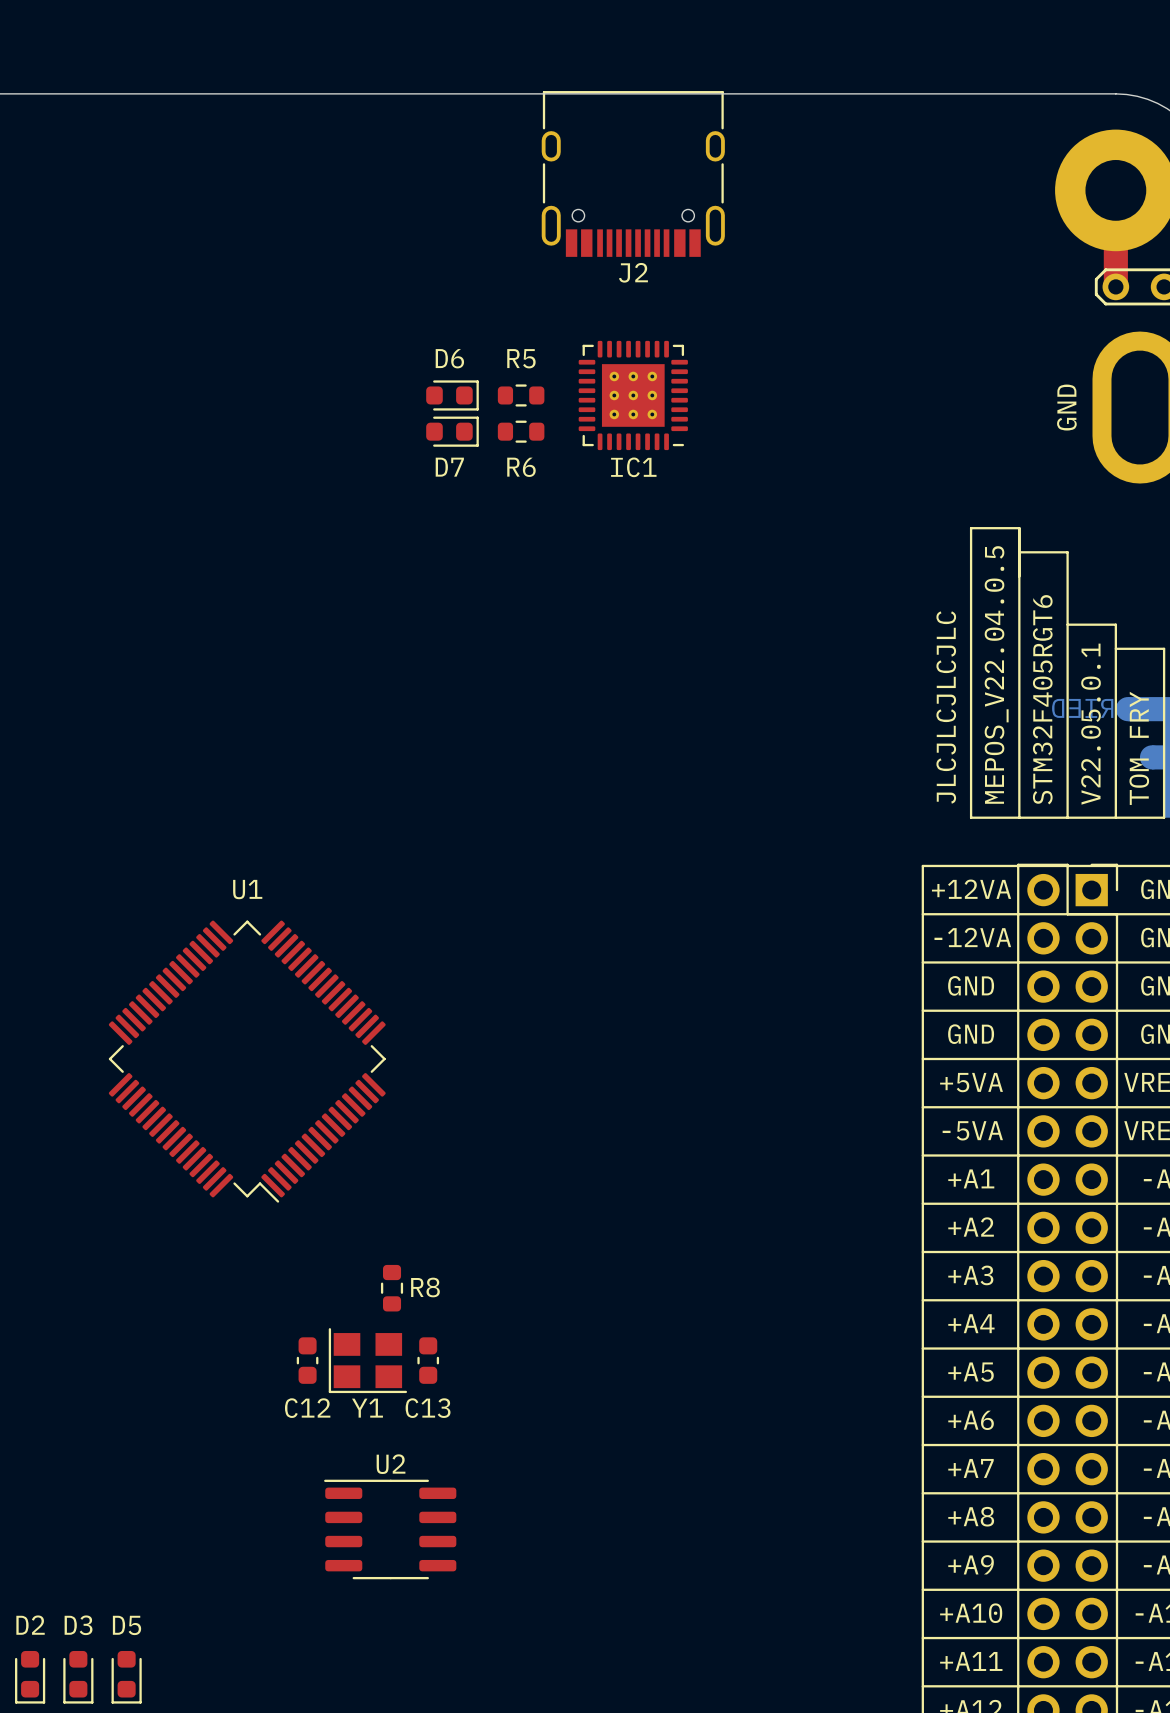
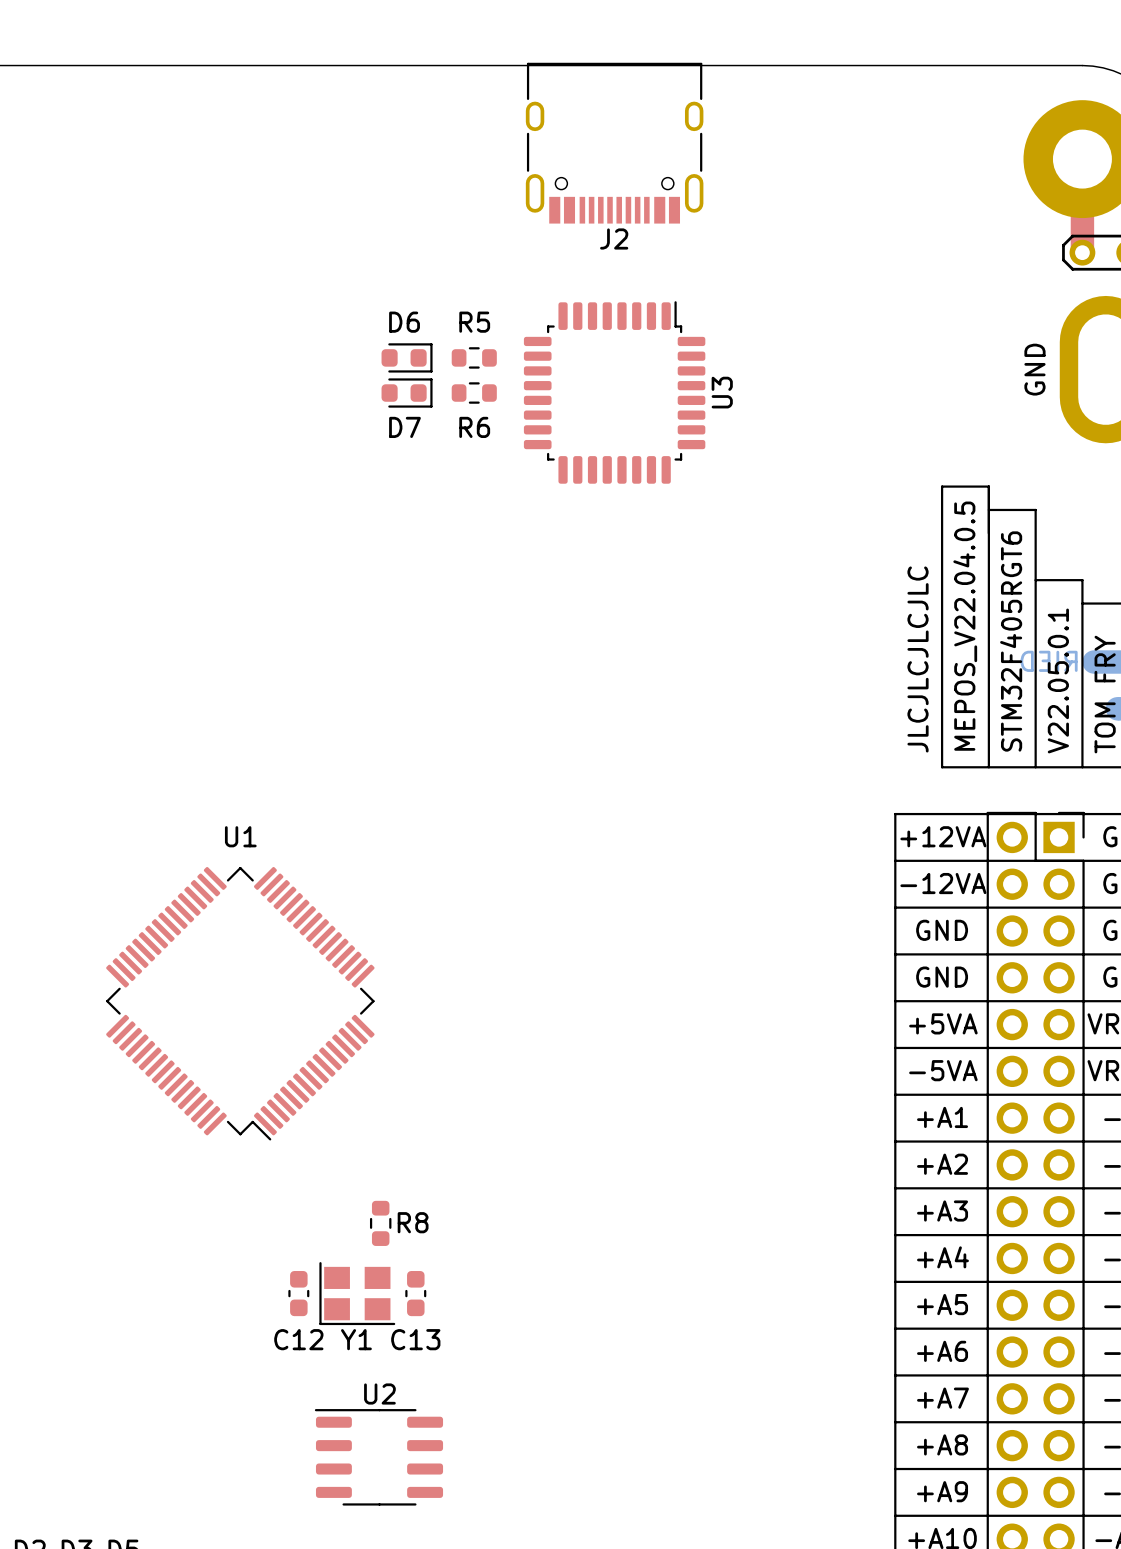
D6 position: (452, 395) -> (407, 357)
R5 position: (521, 395) -> (474, 357)
IC1: (633, 395) -> none
D7 position: (452, 431) -> (407, 393)
R6 position: (521, 431) -> (474, 393)
U3: none -> (614, 392)

